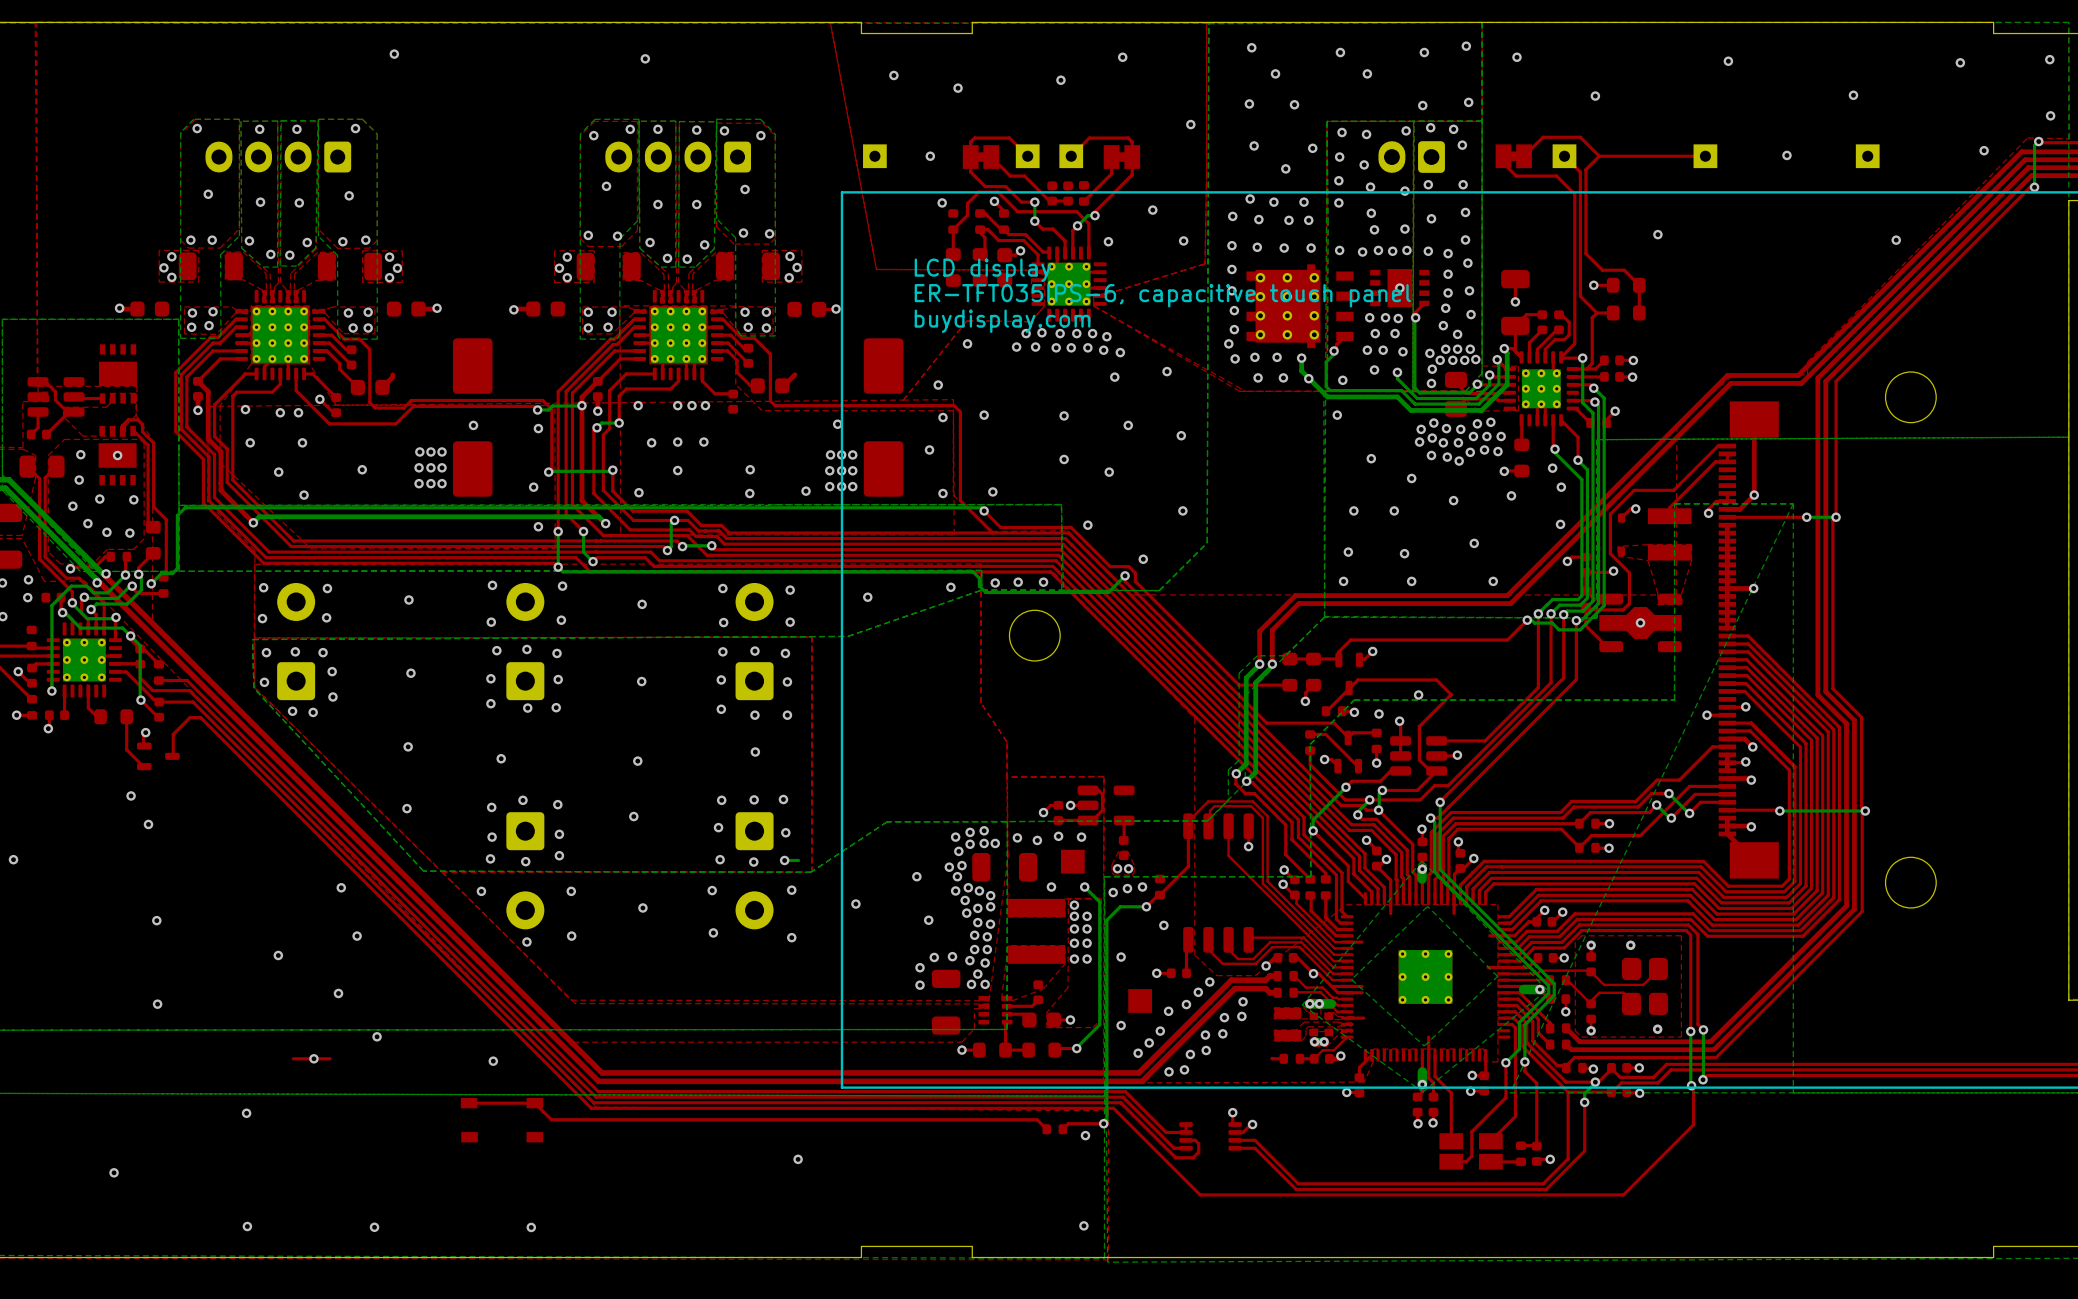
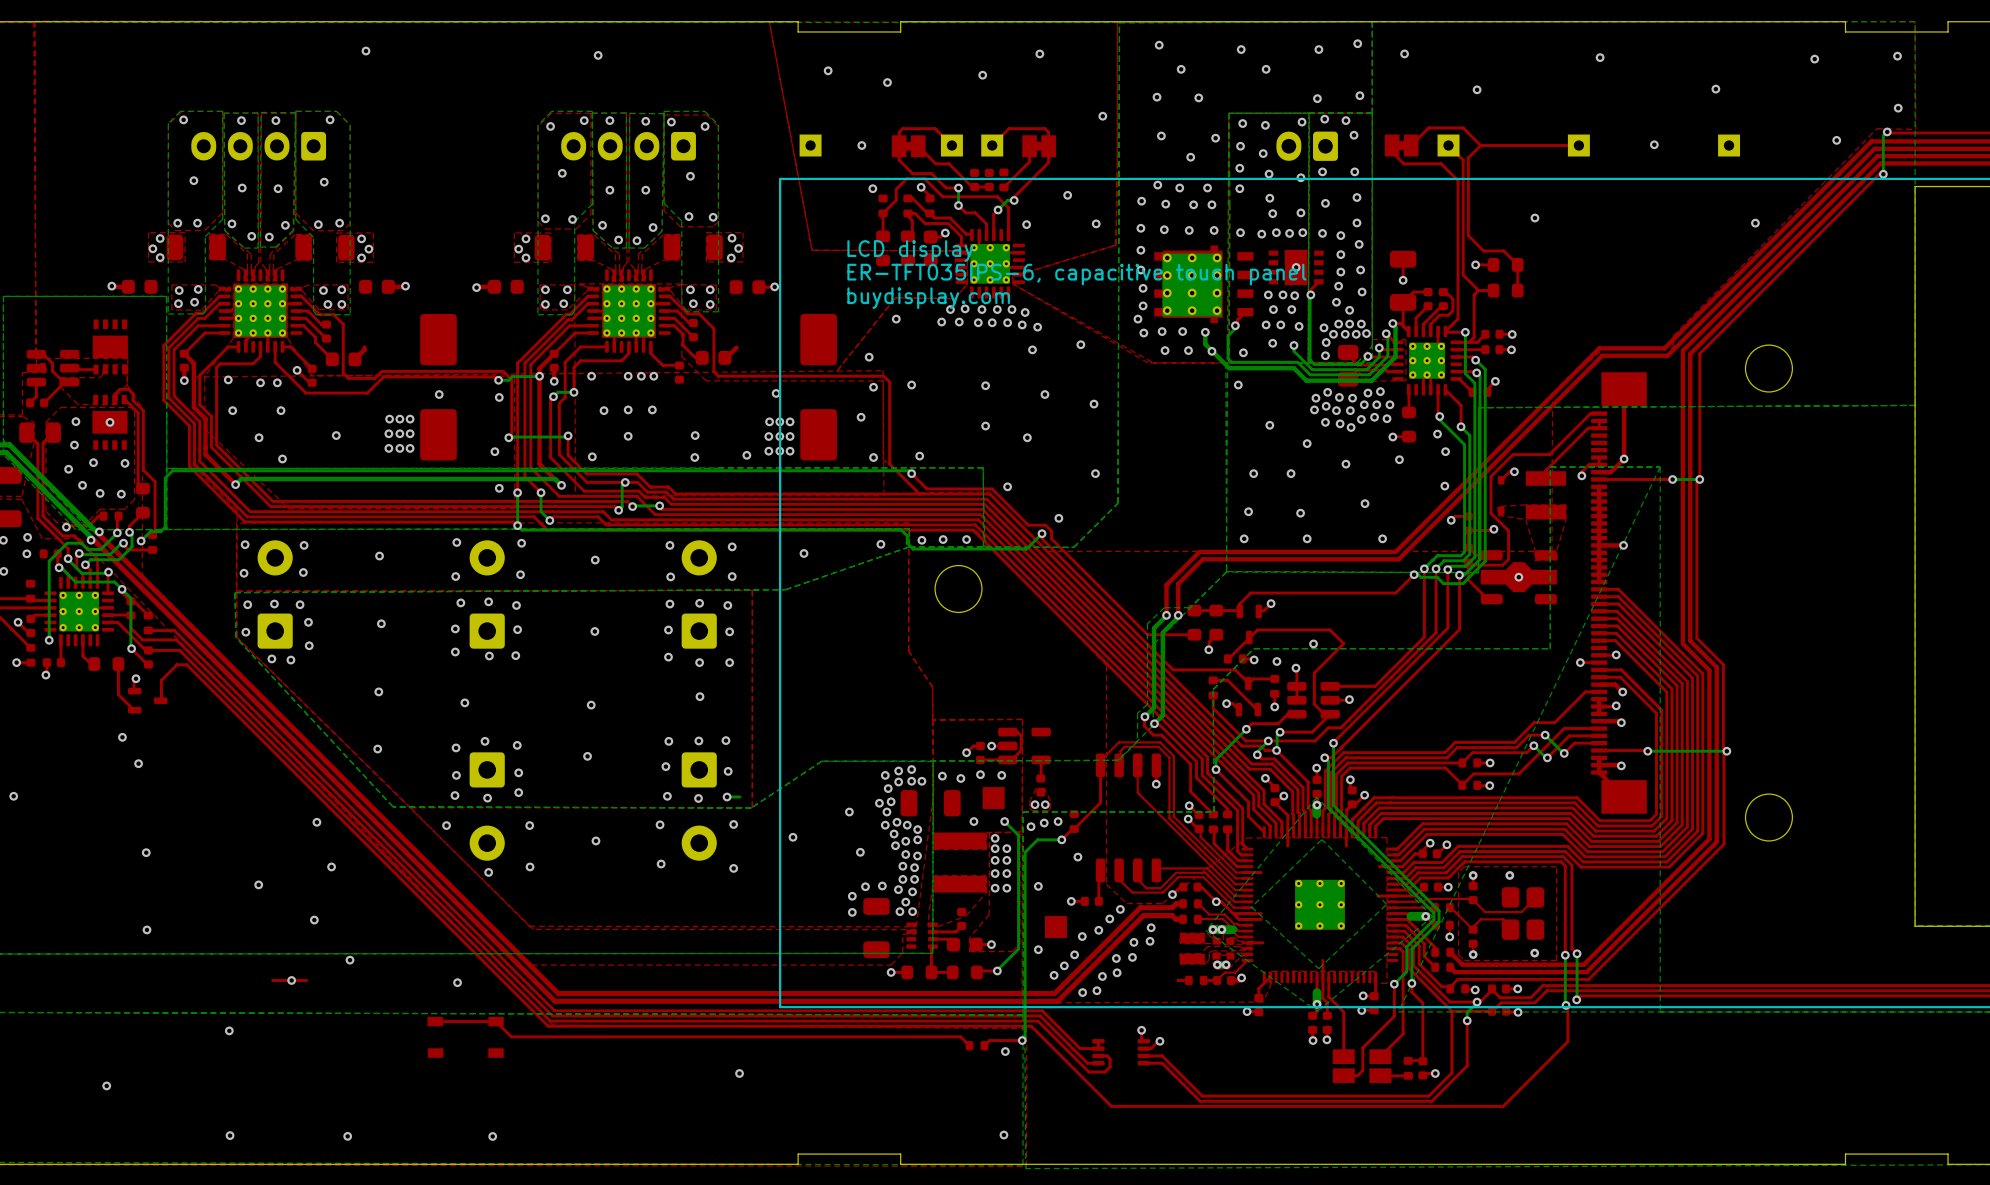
part footprint: [1246, 264, 1354, 349] -> [1154, 245, 1254, 324]

